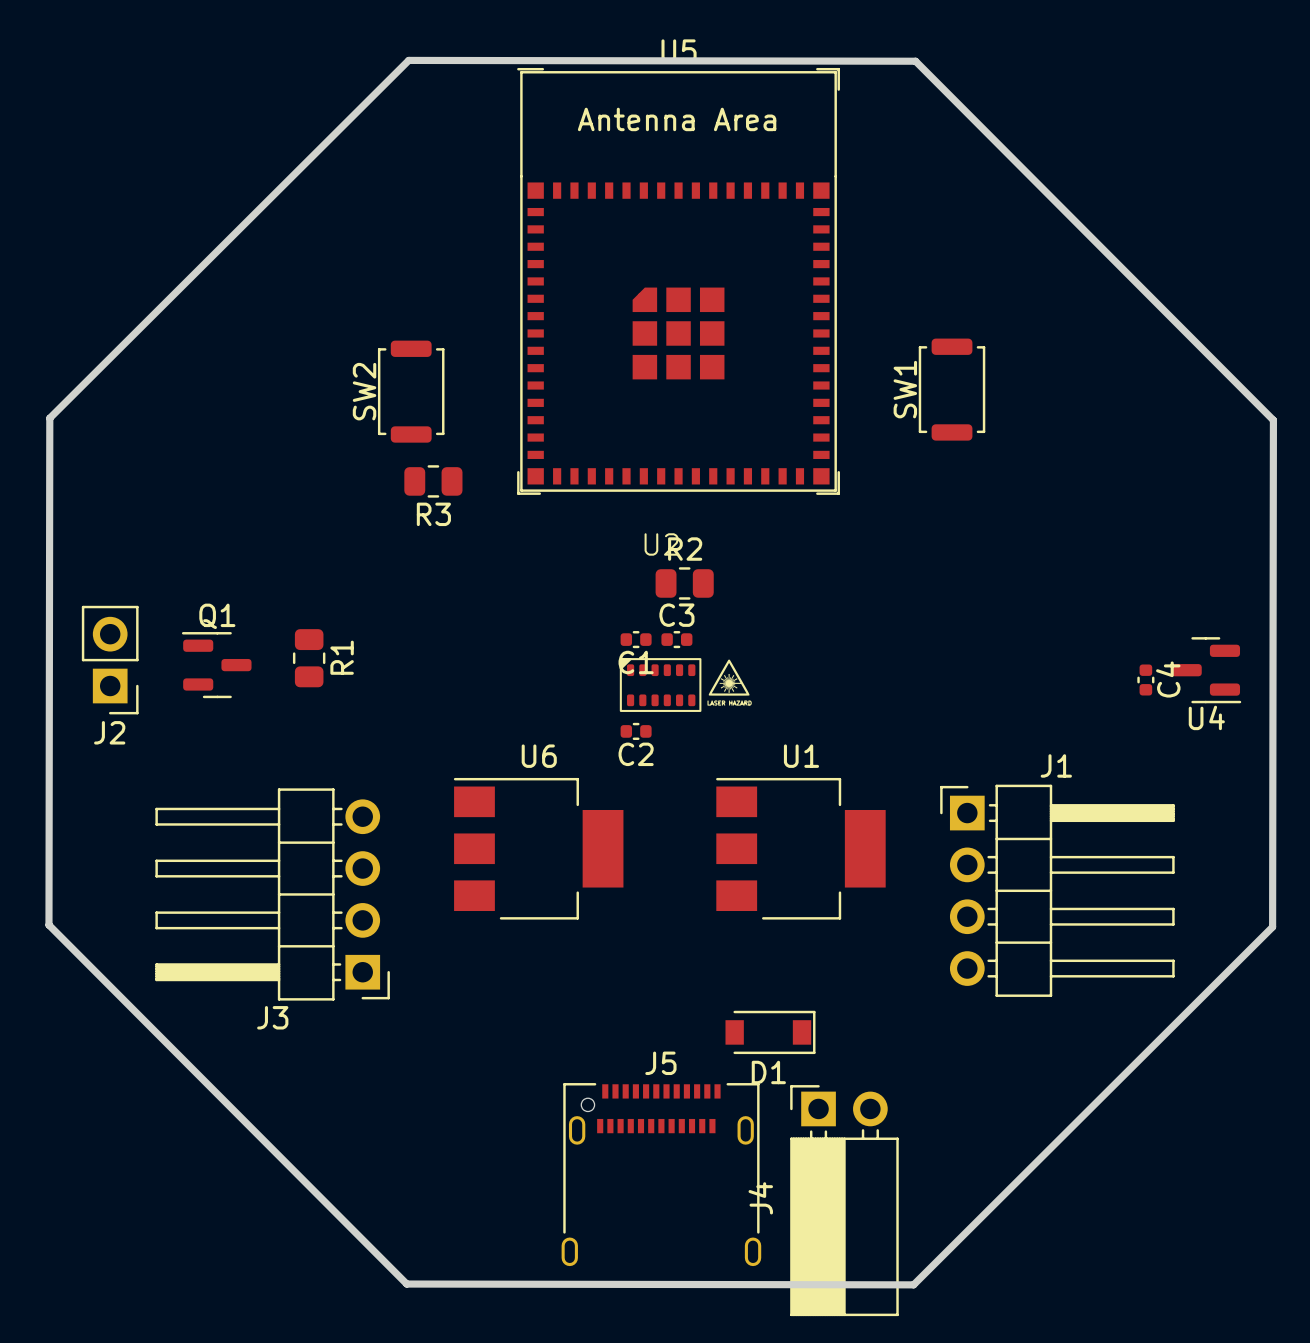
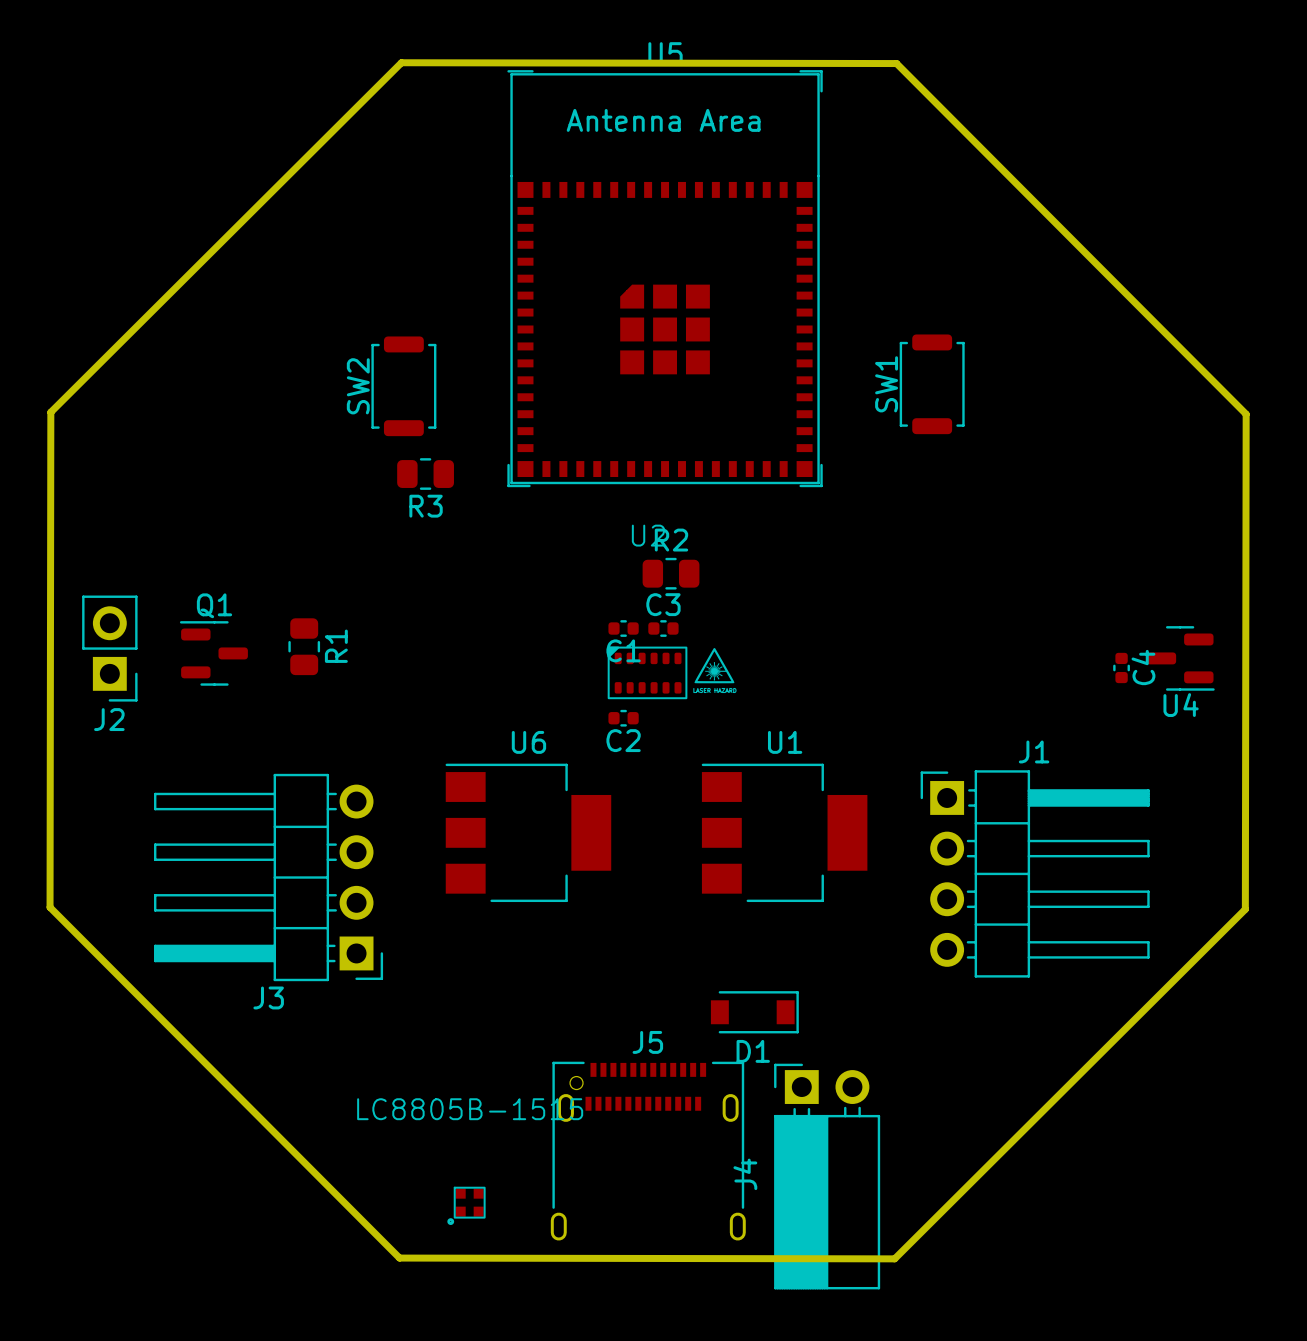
LC8805B-1515: none -> (466, 1205)

